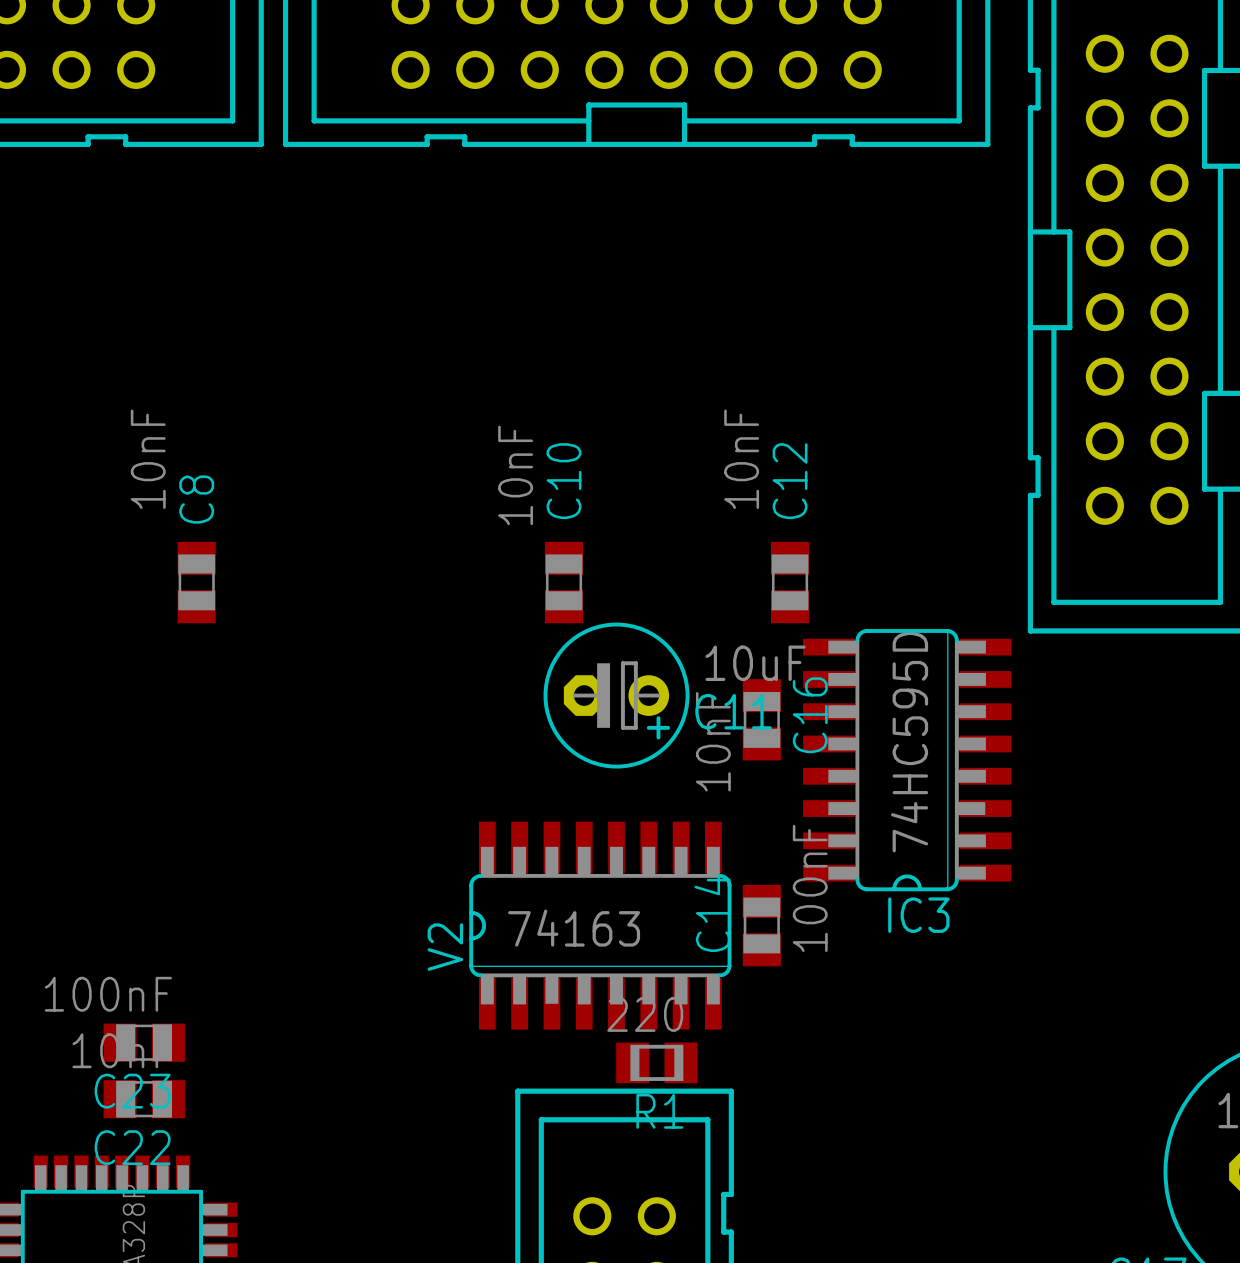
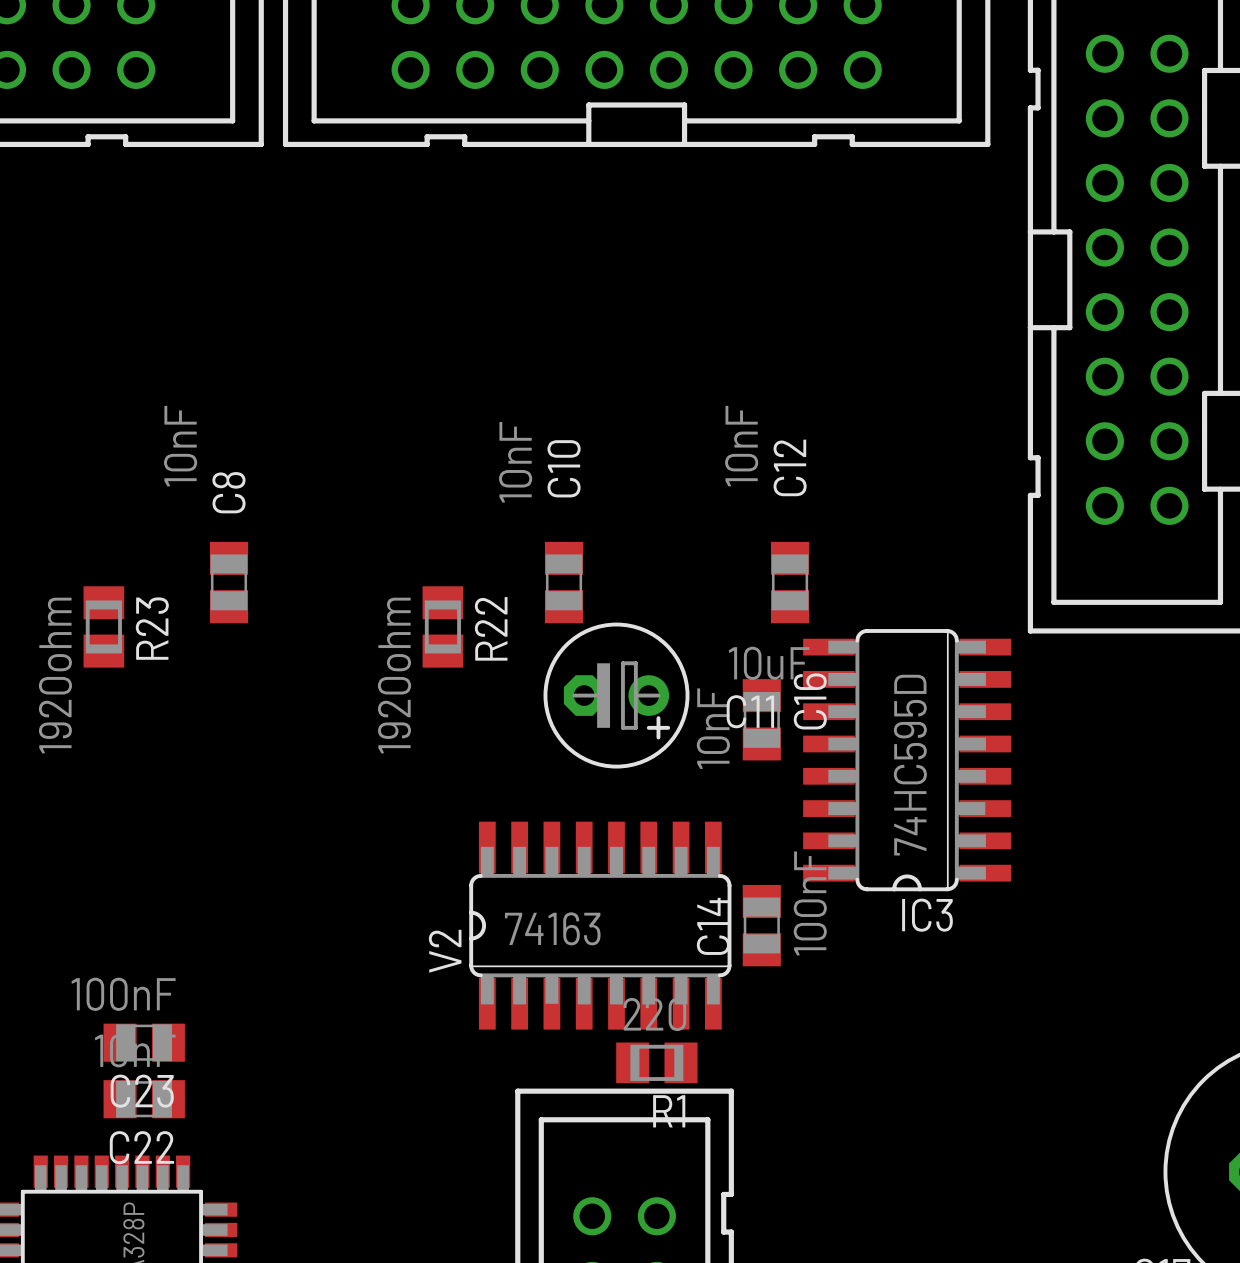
C8 position: (196, 582) -> (228, 582)
R23: none -> 1920ohm (103, 626)
R22: none -> 1920ohm (442, 626)

